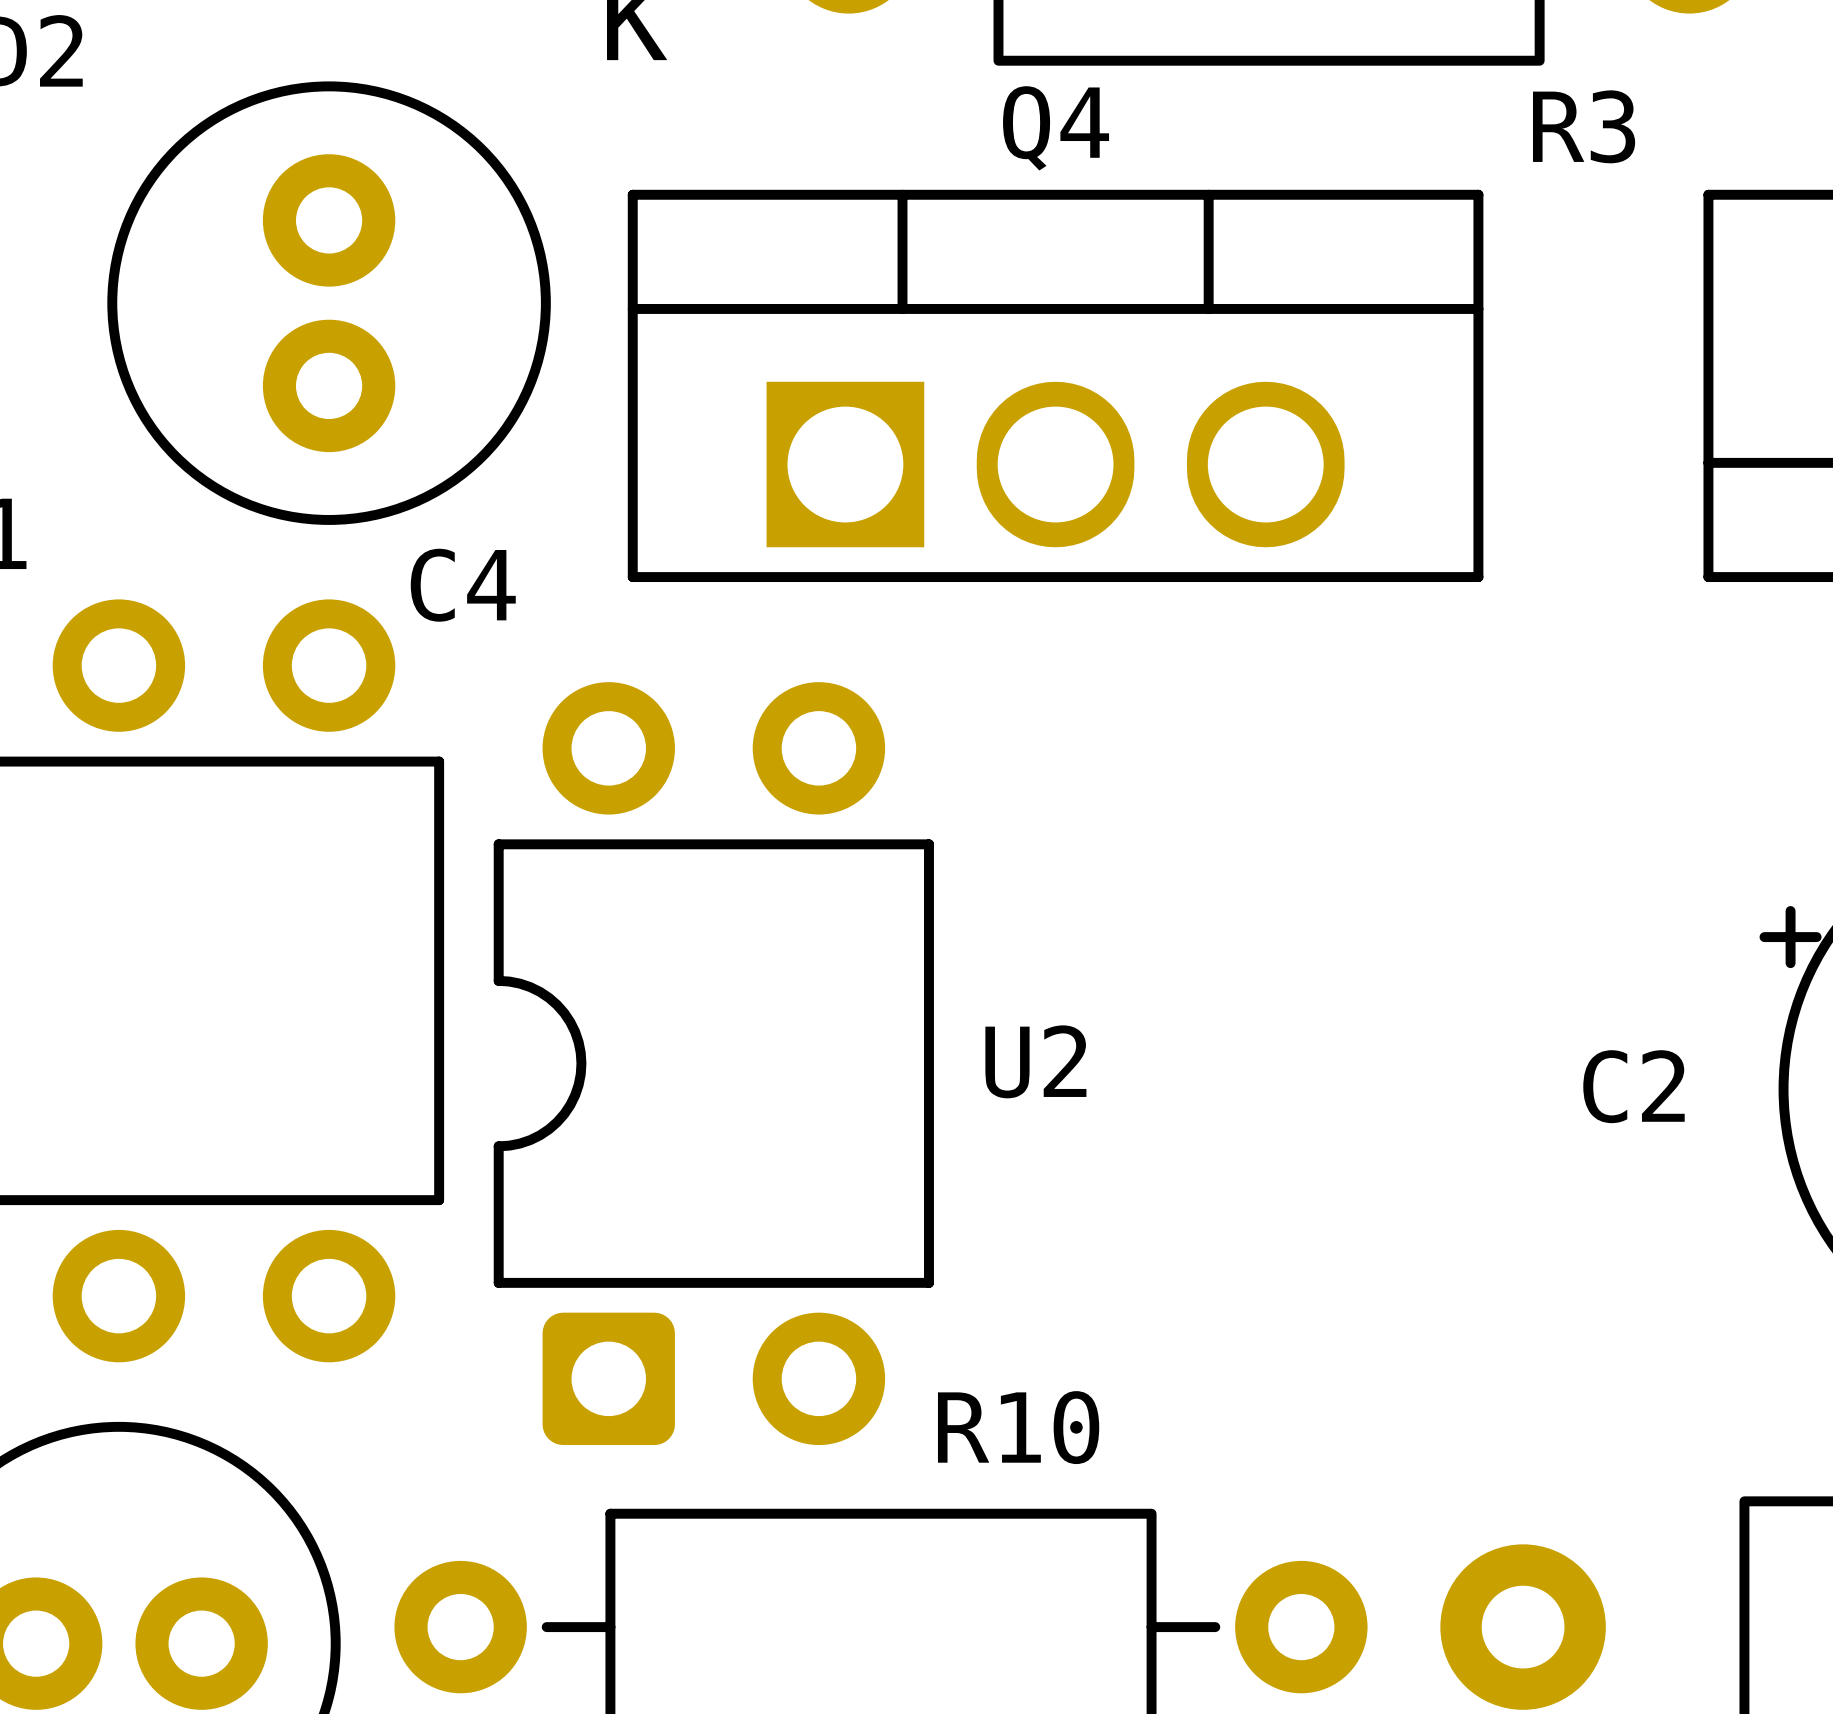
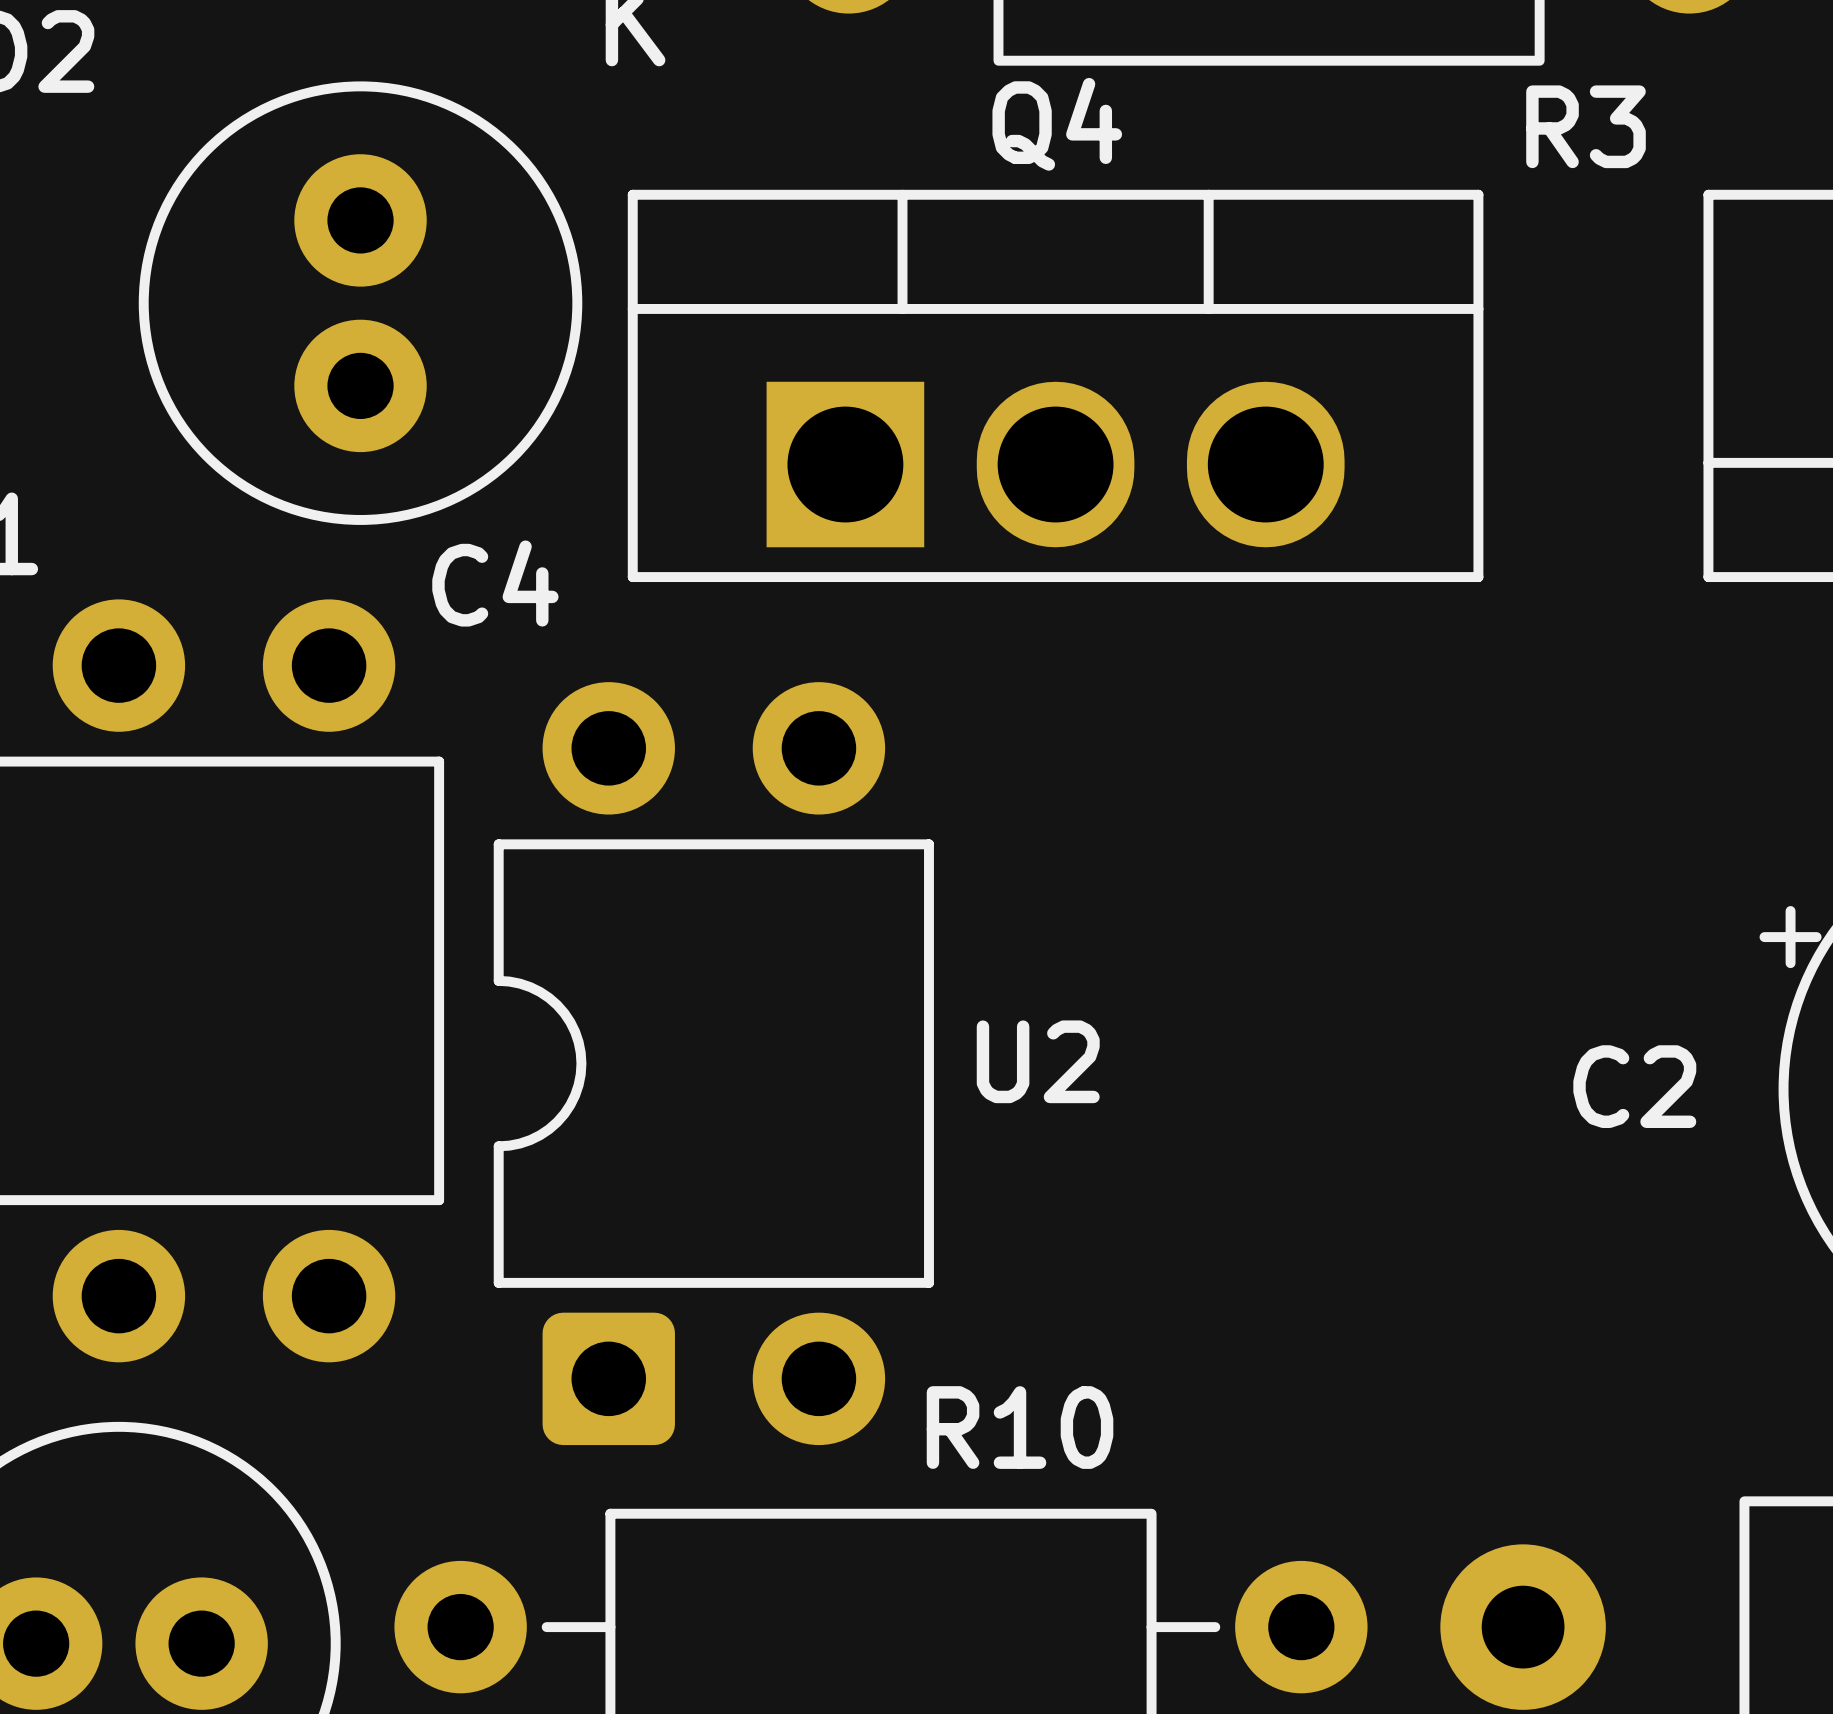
C4 position: (329, 303) -> (360, 303)

